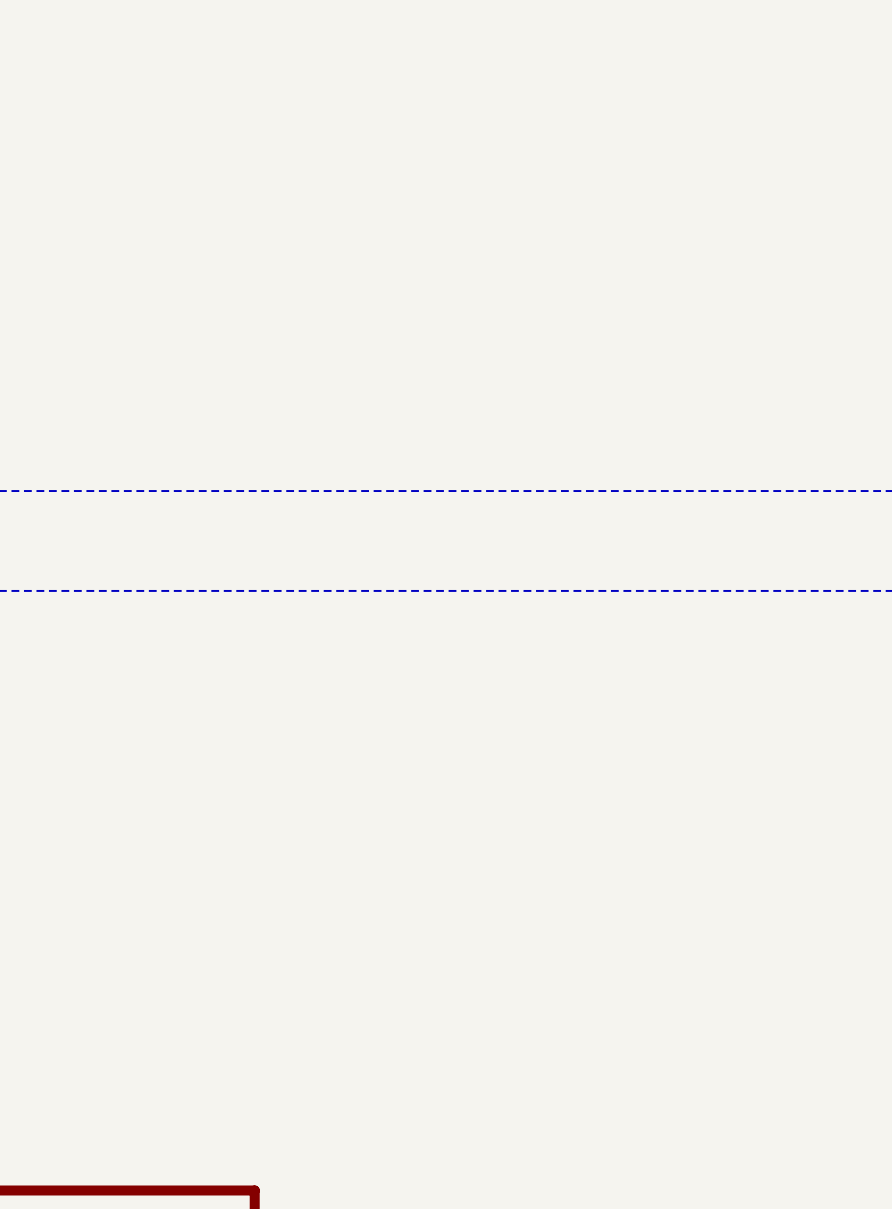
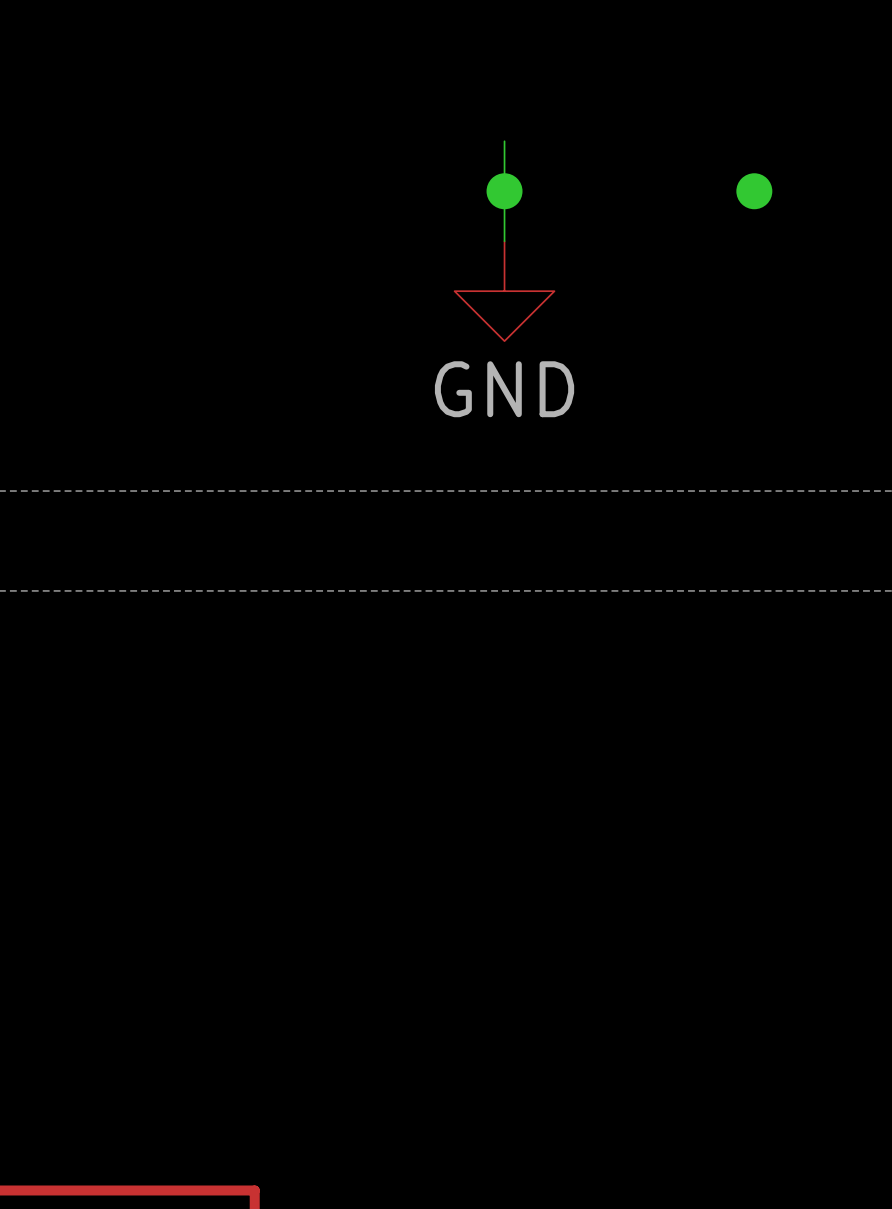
wire: none -> (504, 141) (504, 241)
junction: none -> (504, 191)
junction: none -> (754, 191)
power symbol: none -> GND (504, 291)

